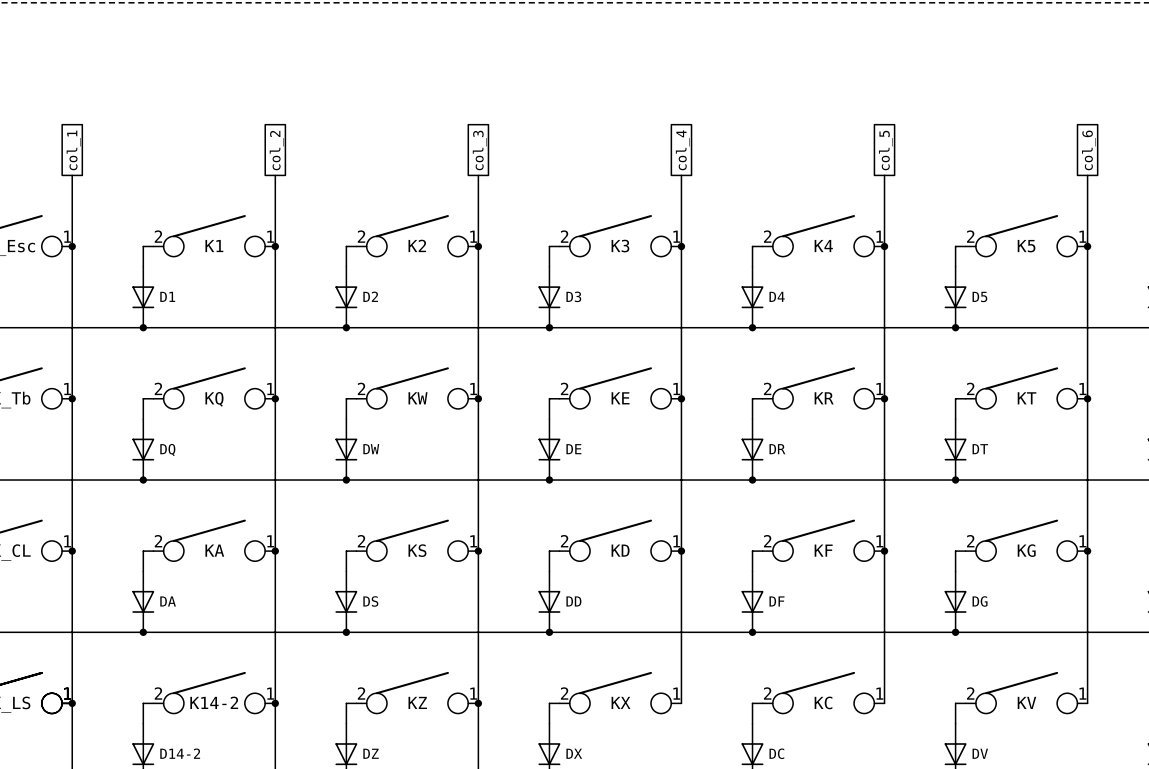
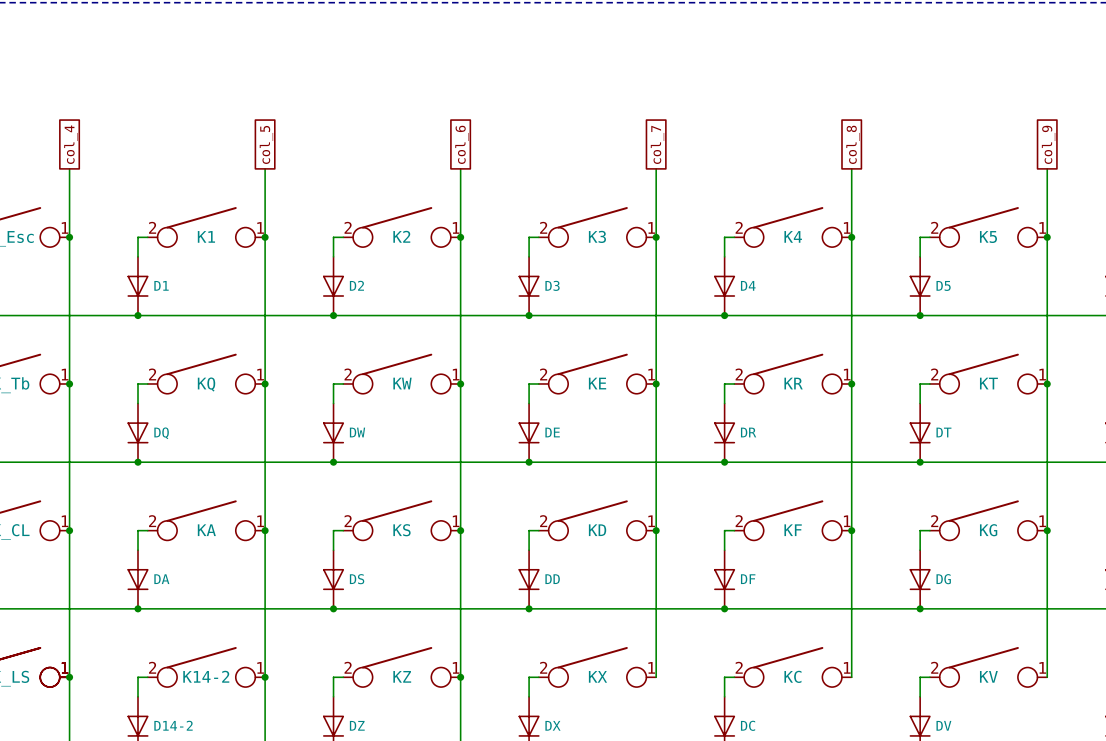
global label: col_1 (73, 150) -> col_4 (70, 144)
global label: col_2 (276, 150) -> col_5 (266, 144)
global label: col_3 (479, 150) -> col_6 (461, 144)
global label: col_4 (682, 150) -> col_7 (657, 144)
global label: col_5 (885, 150) -> col_8 (853, 144)
global label: col_6 (1088, 150) -> col_9 (1048, 144)

